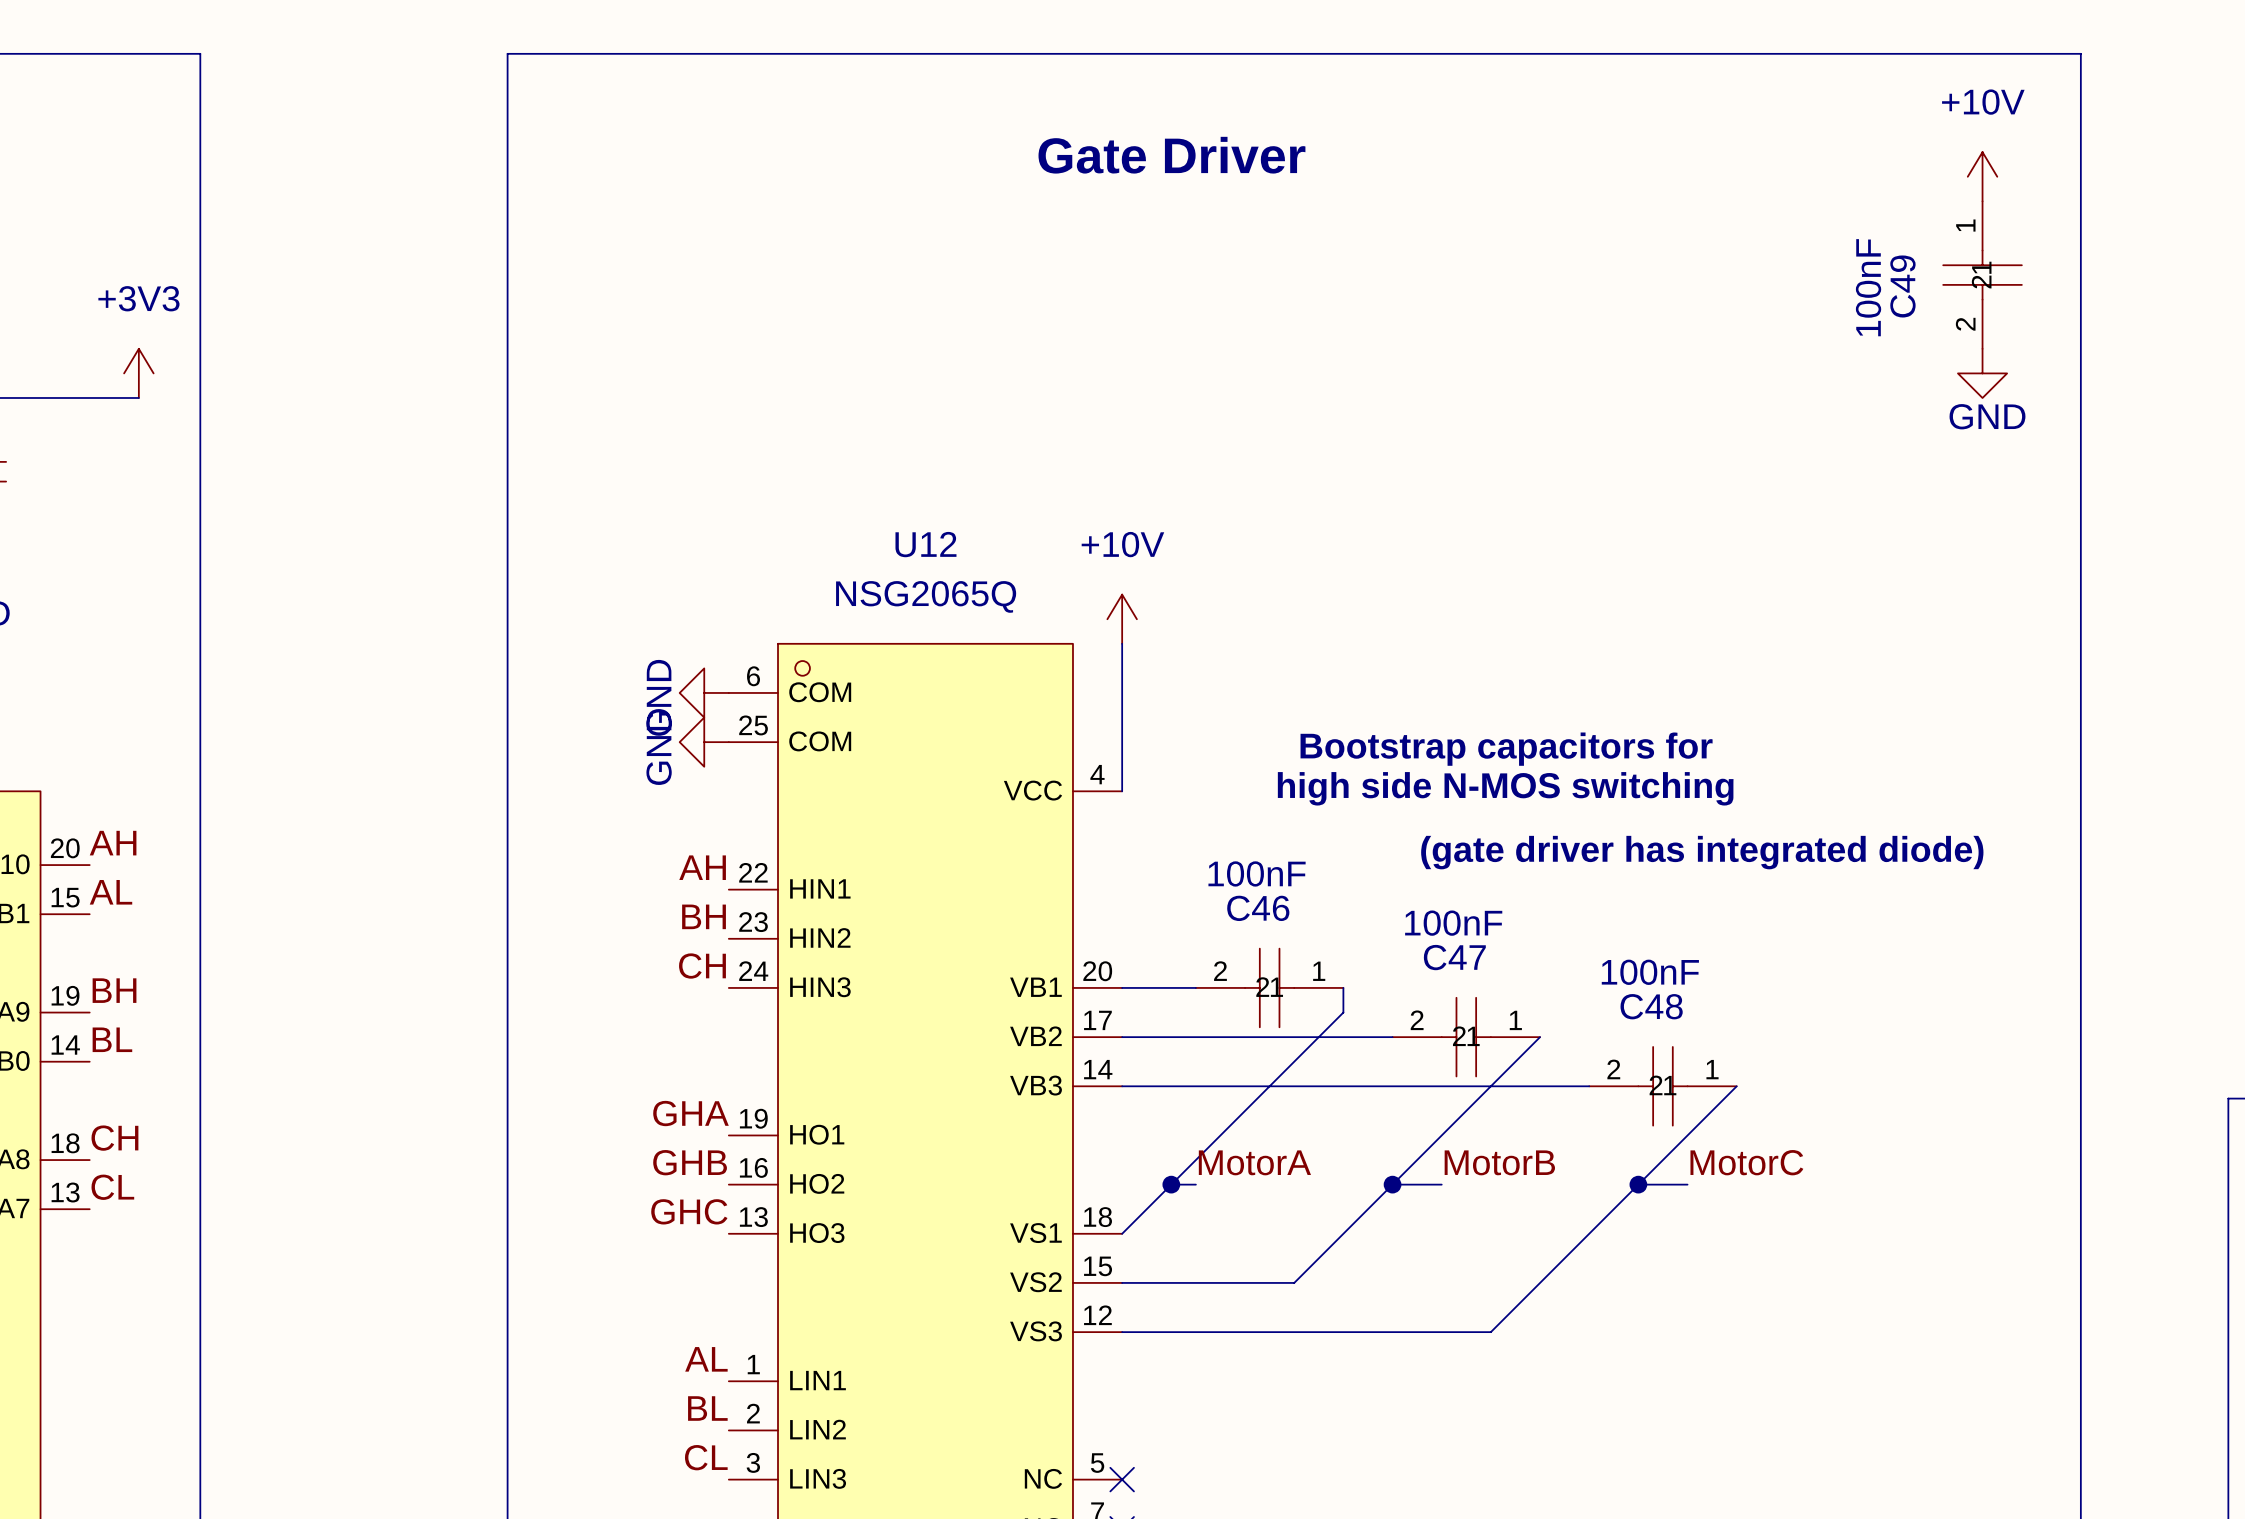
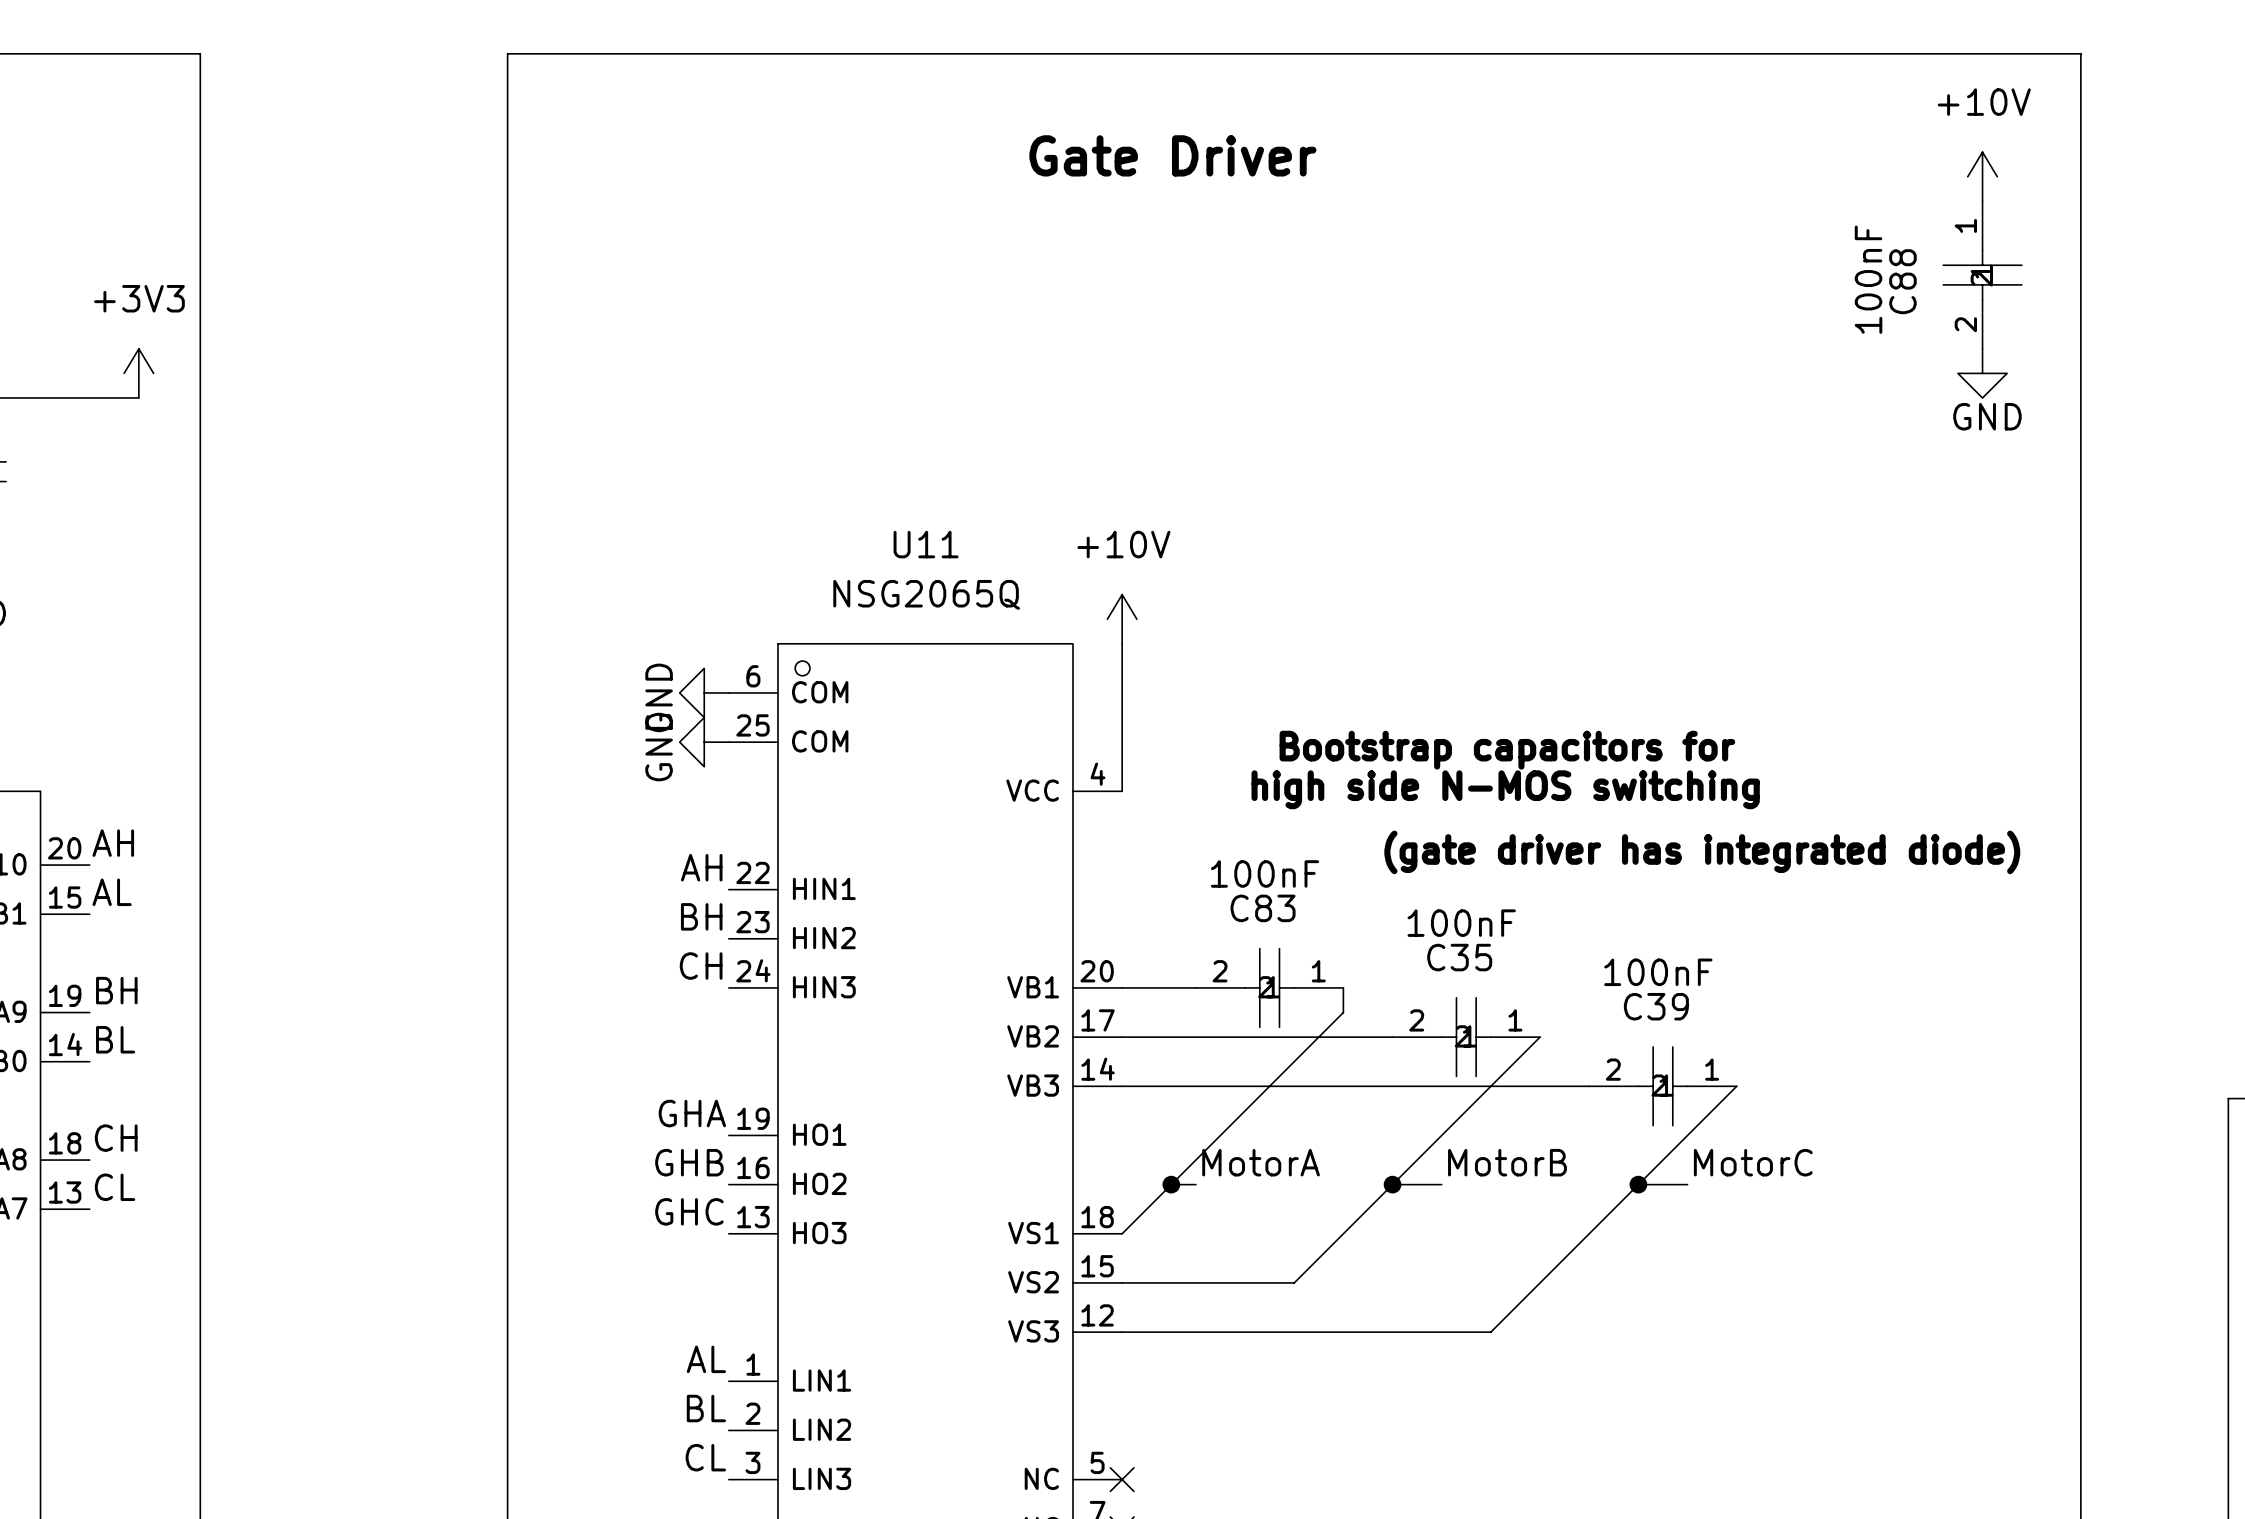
C49 name: C49 (1902, 286) -> C88 (1902, 281)
U12 name: U12 (925, 544) -> U11 (926, 544)
C46 name: C46 (1258, 908) -> C83 (1263, 908)
C47 name: C47 (1454, 957) -> C35 (1459, 957)
C48 name: C48 (1651, 1006) -> C39 (1656, 1006)

